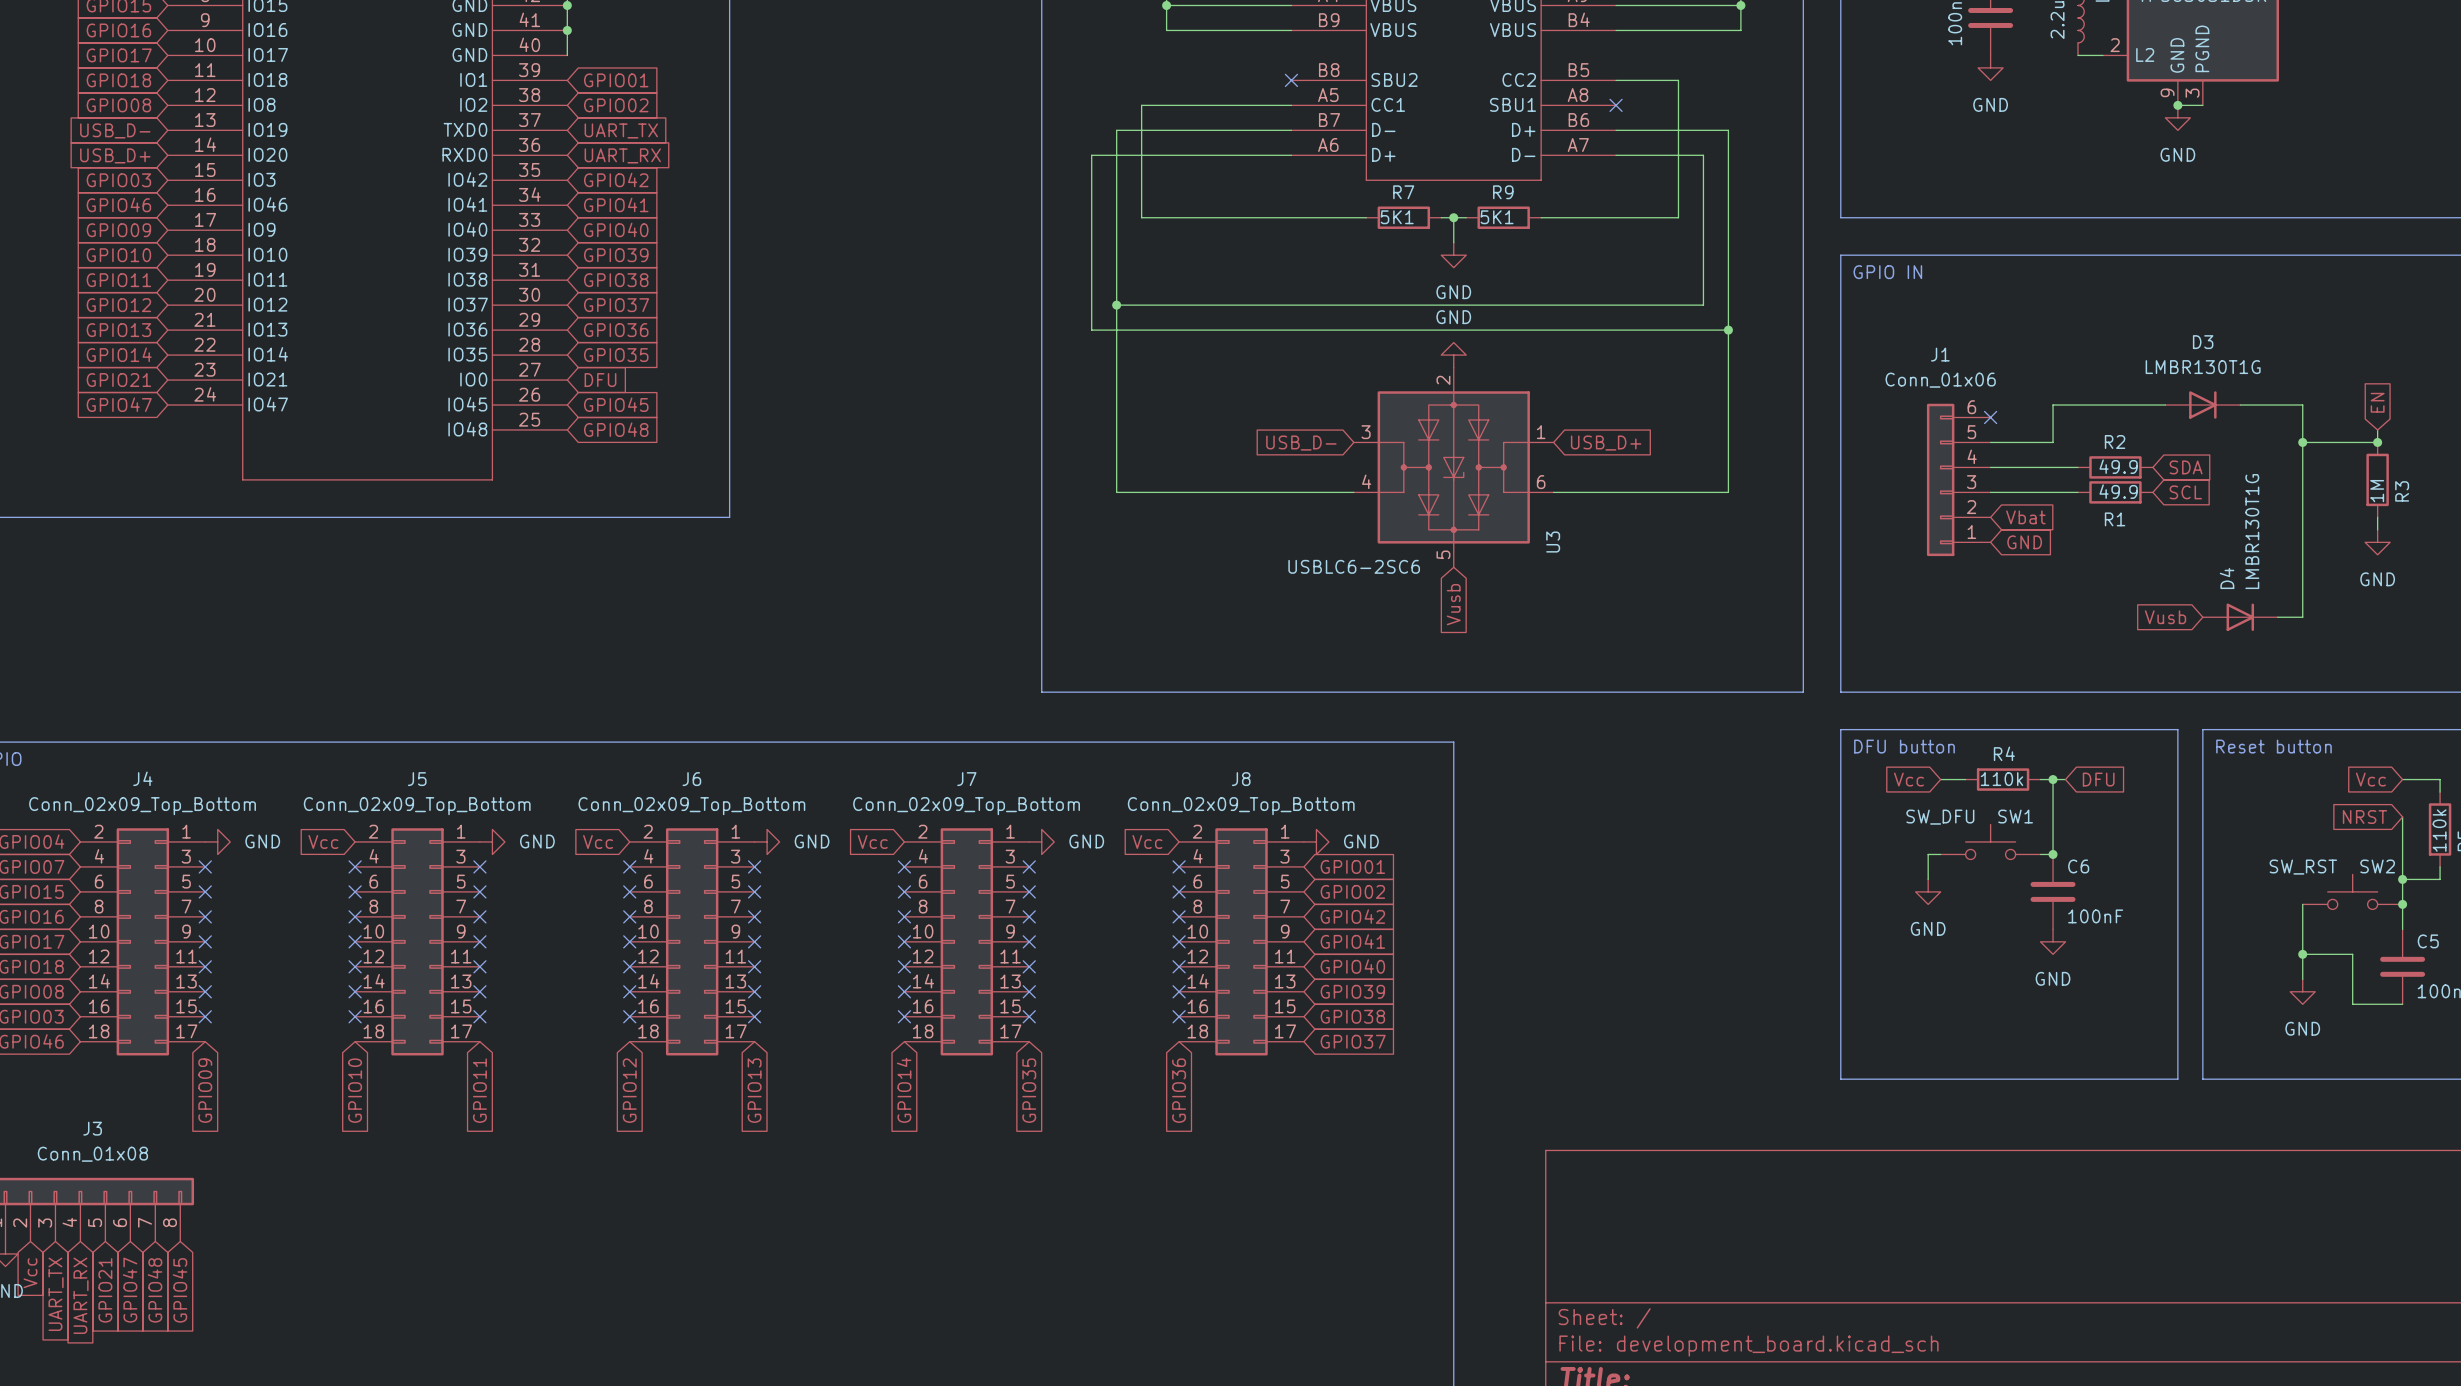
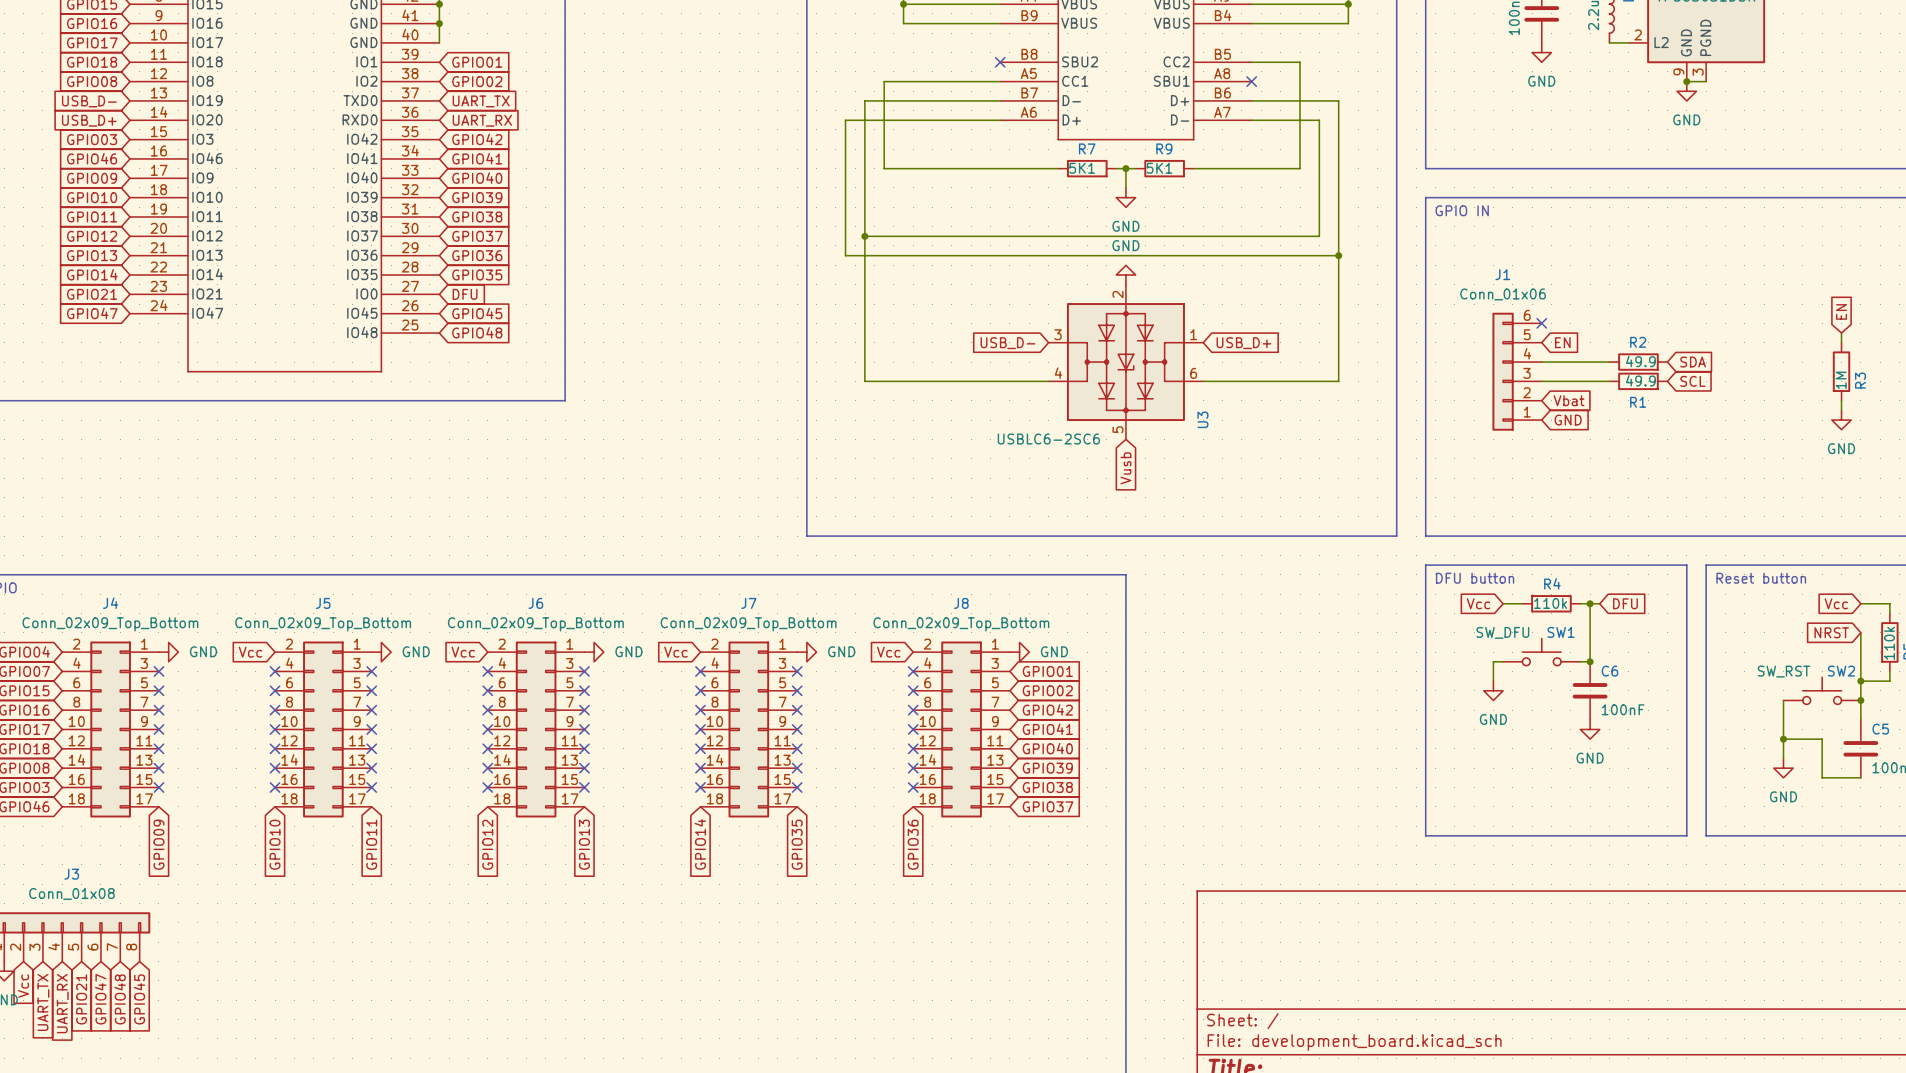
wire: (2165, 405) (2053, 405) (2053, 442) (1990, 442) -> none
D3: LMBR130T1G (2202, 405) -> none
wire: (2240, 405) (2302, 405) (2302, 617) (2277, 617) -> none
global label: none -> EN (1562, 342)
wire: (2302, 442) (2377, 442) -> none
junction: (2302, 442) -> none
junction: (2377, 442) -> none
global label: Vusb (2165, 617) -> none
D4: LMBR130T1G (2240, 617) -> none

